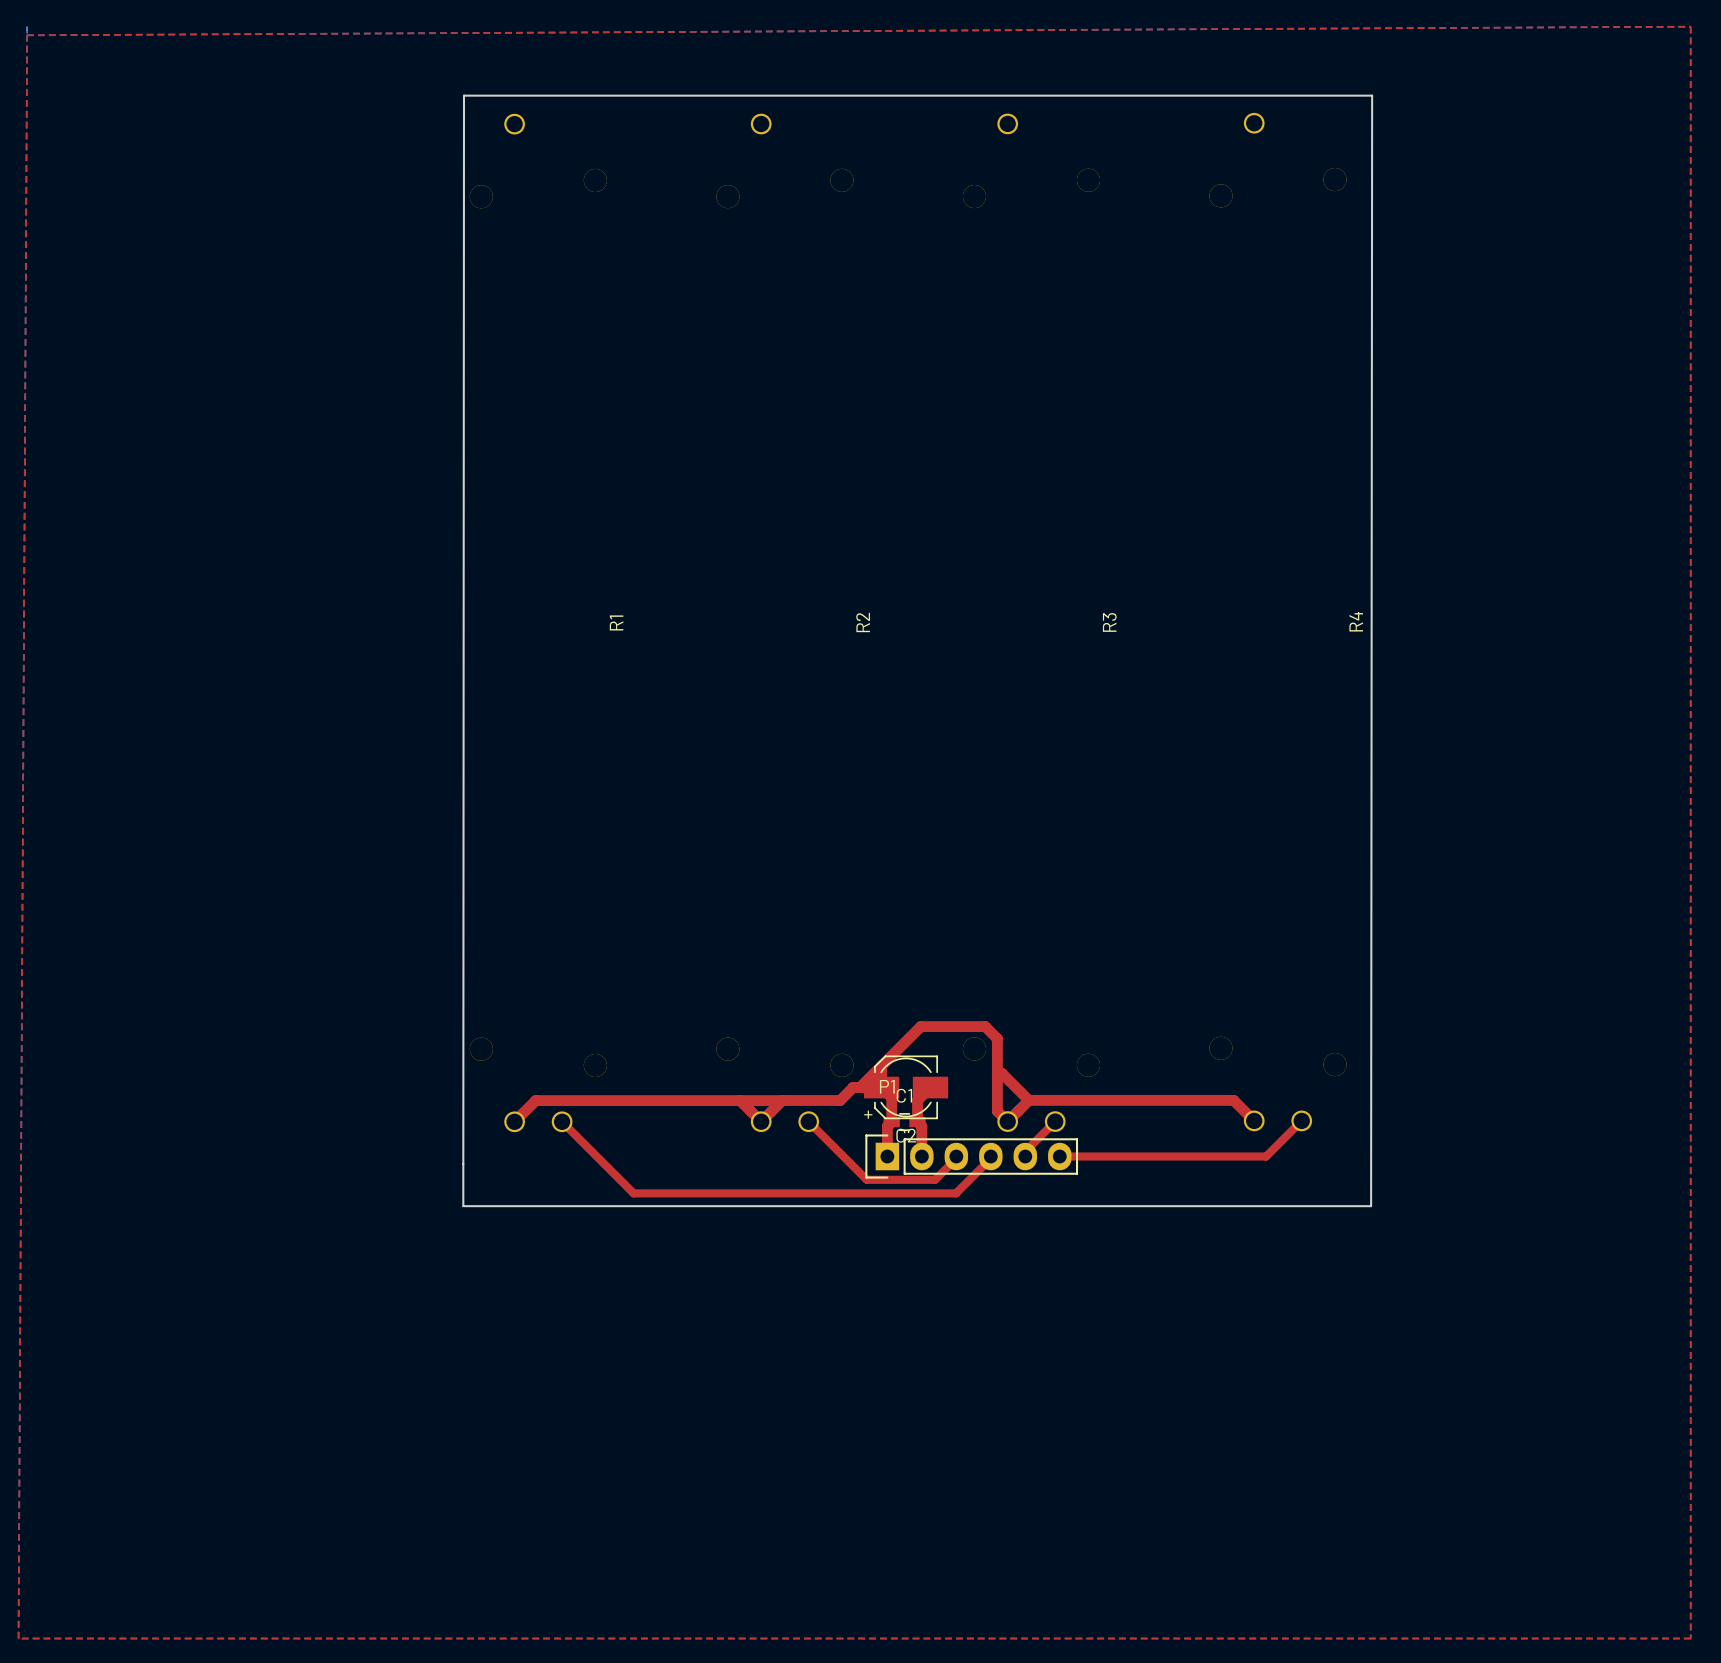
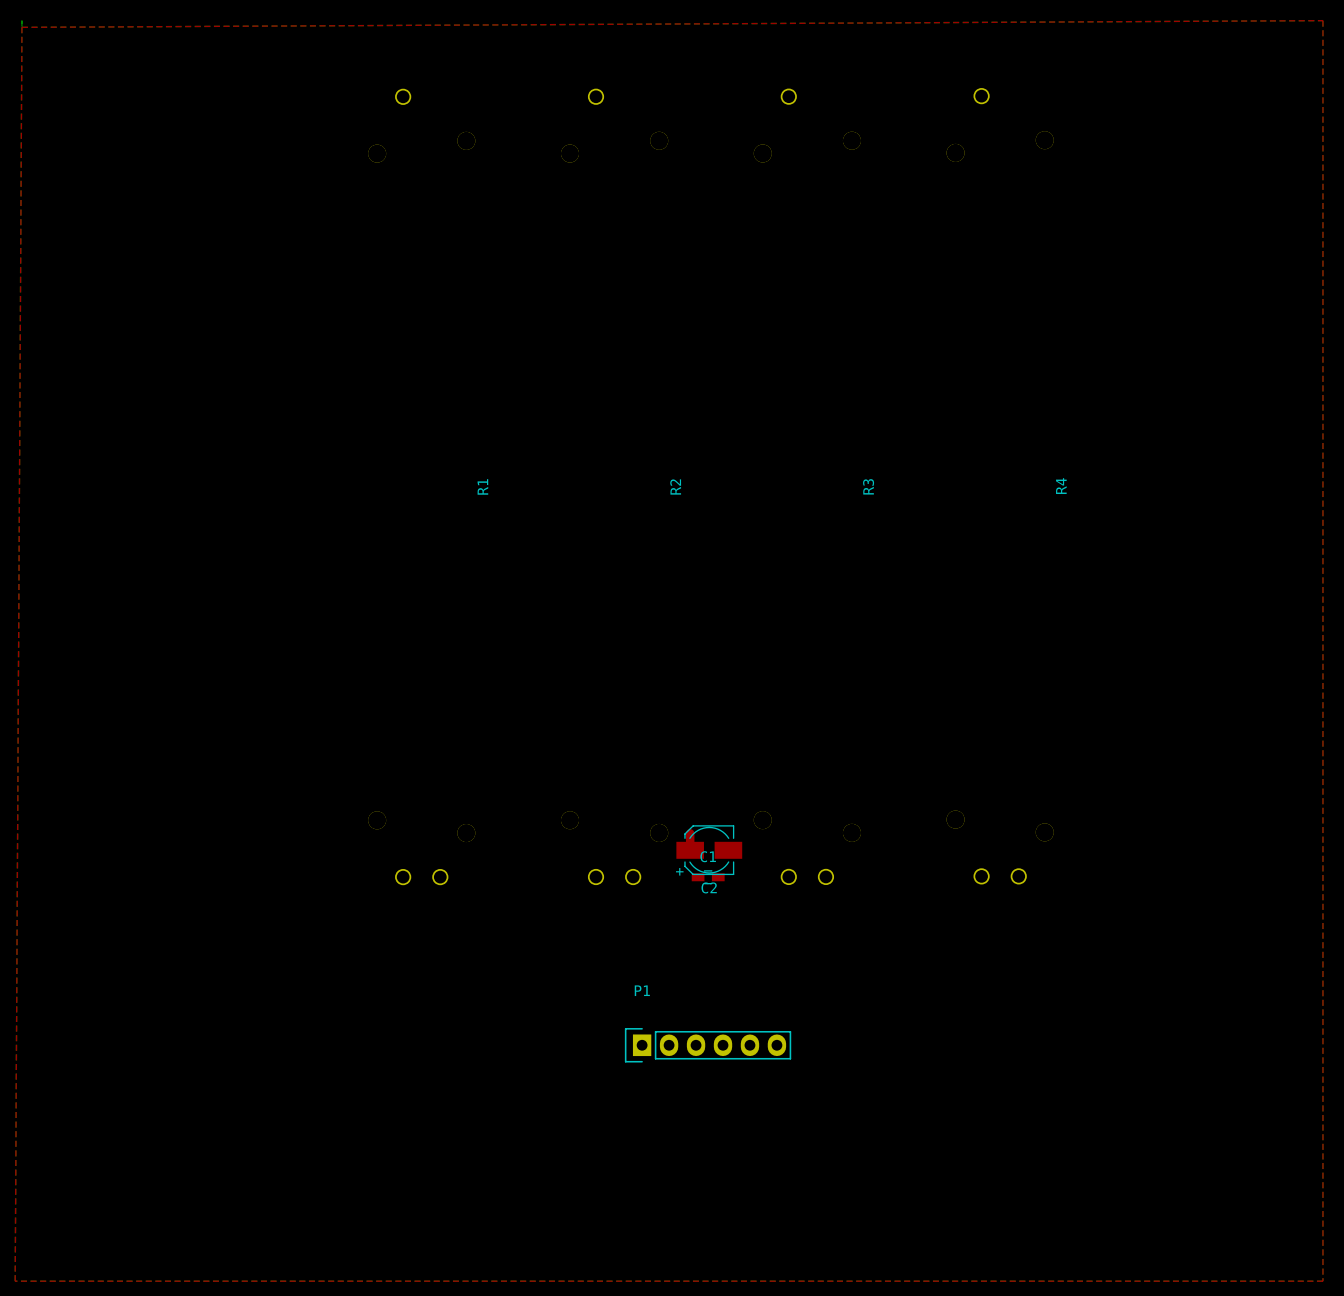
top track: (997, 1073) (1001, 1073) (1028, 1100) -> none
top track: (859, 1087) (920, 1026) (985, 1026) (997, 1038) (997, 1111) (1007, 1121) (1028, 1100) -> none
top track: (930, 1087) (917, 1100) (917, 1122) (921, 1126) (921, 1156) -> none
top track: (740, 1100) (761, 1121) (782, 1100) (840, 1100) (853, 1087) (881, 1087) (891, 1097) (891, 1122) (887, 1126) (887, 1156) -> none
top track: (782, 1100) (535, 1100) (514, 1121) -> none
top track: (1028, 1100) (1233, 1100) (1254, 1120) -> none
top track: (1301, 1120) (1266, 1156) (1059, 1156) -> none
top track: (562, 1121) (633, 1193) (956, 1193) (990, 1156) -> none
top track: (808, 1121) (866, 1179) (935, 1179) (956, 1156) -> none
top track: (1055, 1121) (1025, 1151) (1025, 1156) -> none
P1 position: (971, 1156) -> (708, 1045)
board edge: (463, 1206) (464, 95) (1372, 95) (1371, 1206) (463, 1206) -> none

